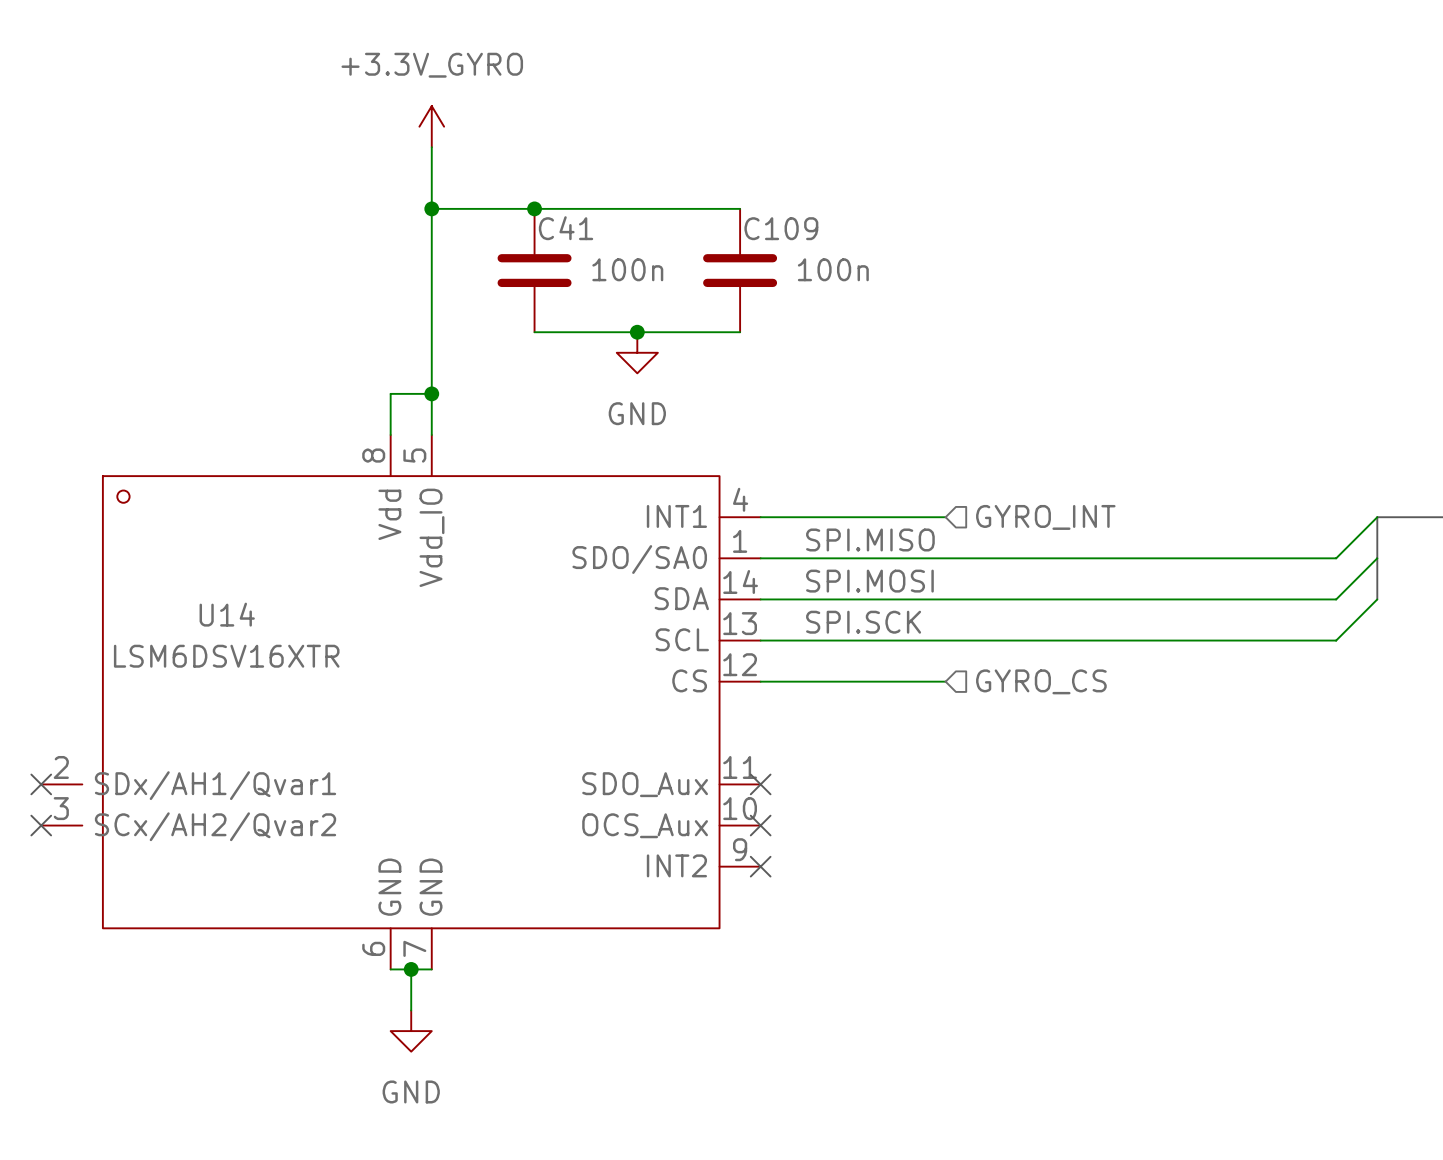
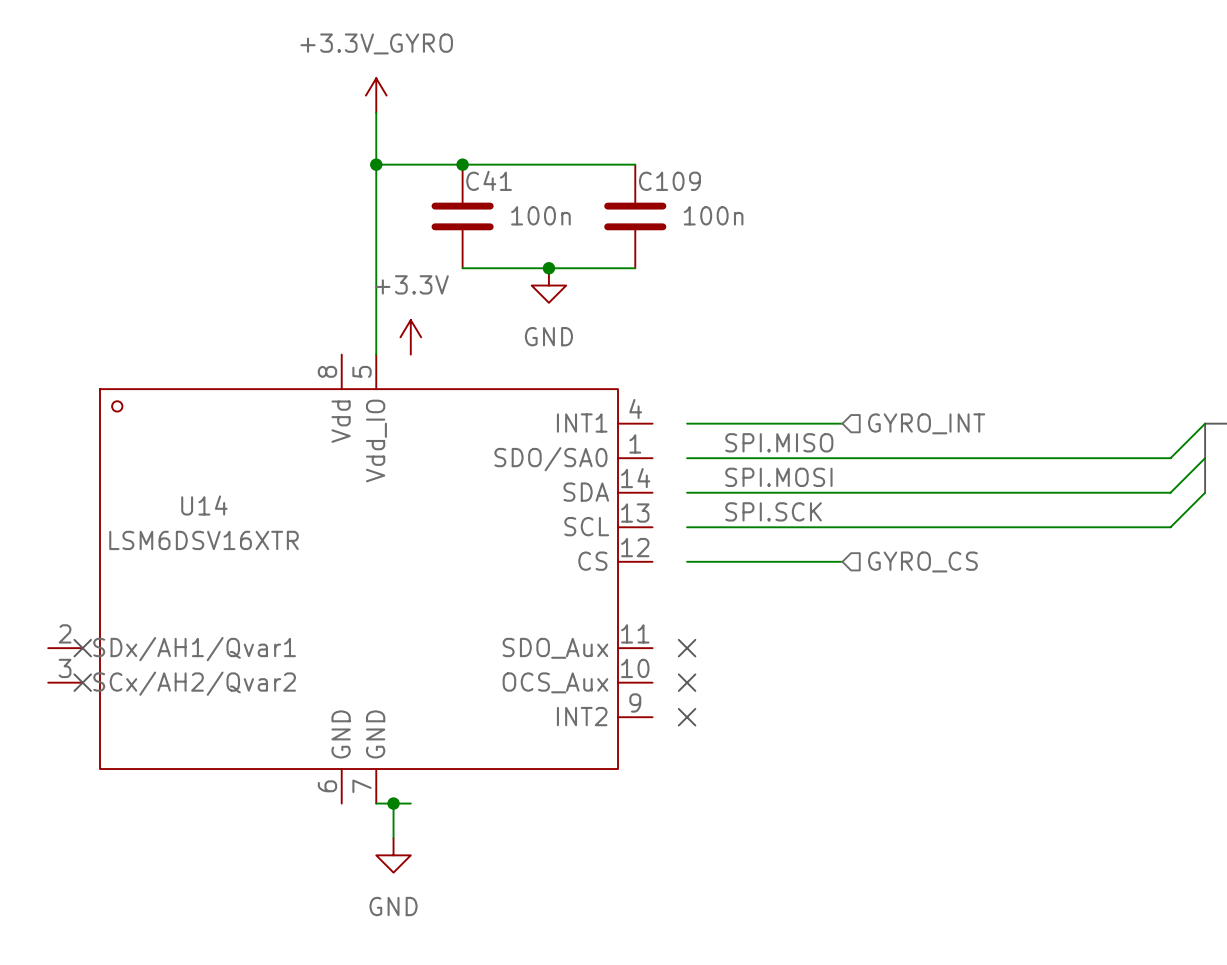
wire: (431, 393) (390, 393) (390, 435) -> none
junction: (431, 393) -> none
power symbol: none -> +3.3V (410, 337)
wire: (760, 517) (801, 517) -> (807, 423) (842, 423)
hierarchical label position: GYRO_INT (1045, 517) -> GYRO_INT (926, 423)
wire: (1377, 517) (1336, 558) -> (1205, 423) (1170, 458) (1136, 458)
bus: (1418, 517) (1377, 517) (1377, 599) -> (1205, 423) (1205, 492)
label position: SPI.MISO (870, 539) -> SPI.MISO (779, 442)
wire: (760, 558) (801, 558) -> none
wire: (1377, 558) (1336, 599) -> (1205, 458) (1170, 492) (1136, 492)
label position: SPI.MOSI (869, 581) -> SPI.MOSI (778, 477)
wire: (760, 599) (801, 599) -> none
wire: (1377, 599) (1336, 640) -> (1205, 492) (1170, 527) (1136, 527)
label position: SPI.SCK (863, 622) -> SPI.SCK (773, 511)
wire: (760, 640) (801, 640) -> none
wire: (760, 681) (801, 681) -> (807, 561) (842, 561)
hierarchical label position: GYRO_CS (1041, 681) -> GYRO_CS (922, 561)
no-connect mark: (41, 784) -> none
no-connect mark: none -> (82, 648)
no-connect mark: (760, 784) -> none
no-connect mark: none -> (687, 648)
no-connect mark: (41, 825) -> none
no-connect mark: none -> (82, 682)
no-connect mark: (760, 825) -> none
no-connect mark: none -> (687, 682)
no-connect mark: (760, 866) -> none
no-connect mark: none -> (687, 717)
wire: (390, 969) (431, 969) -> (410, 803) (376, 803)
wire: (411, 969) (411, 1010) -> (393, 803) (393, 838)
junction position: (411, 969) -> (393, 803)
power symbol position: GND (411, 1031) -> GND (393, 855)

